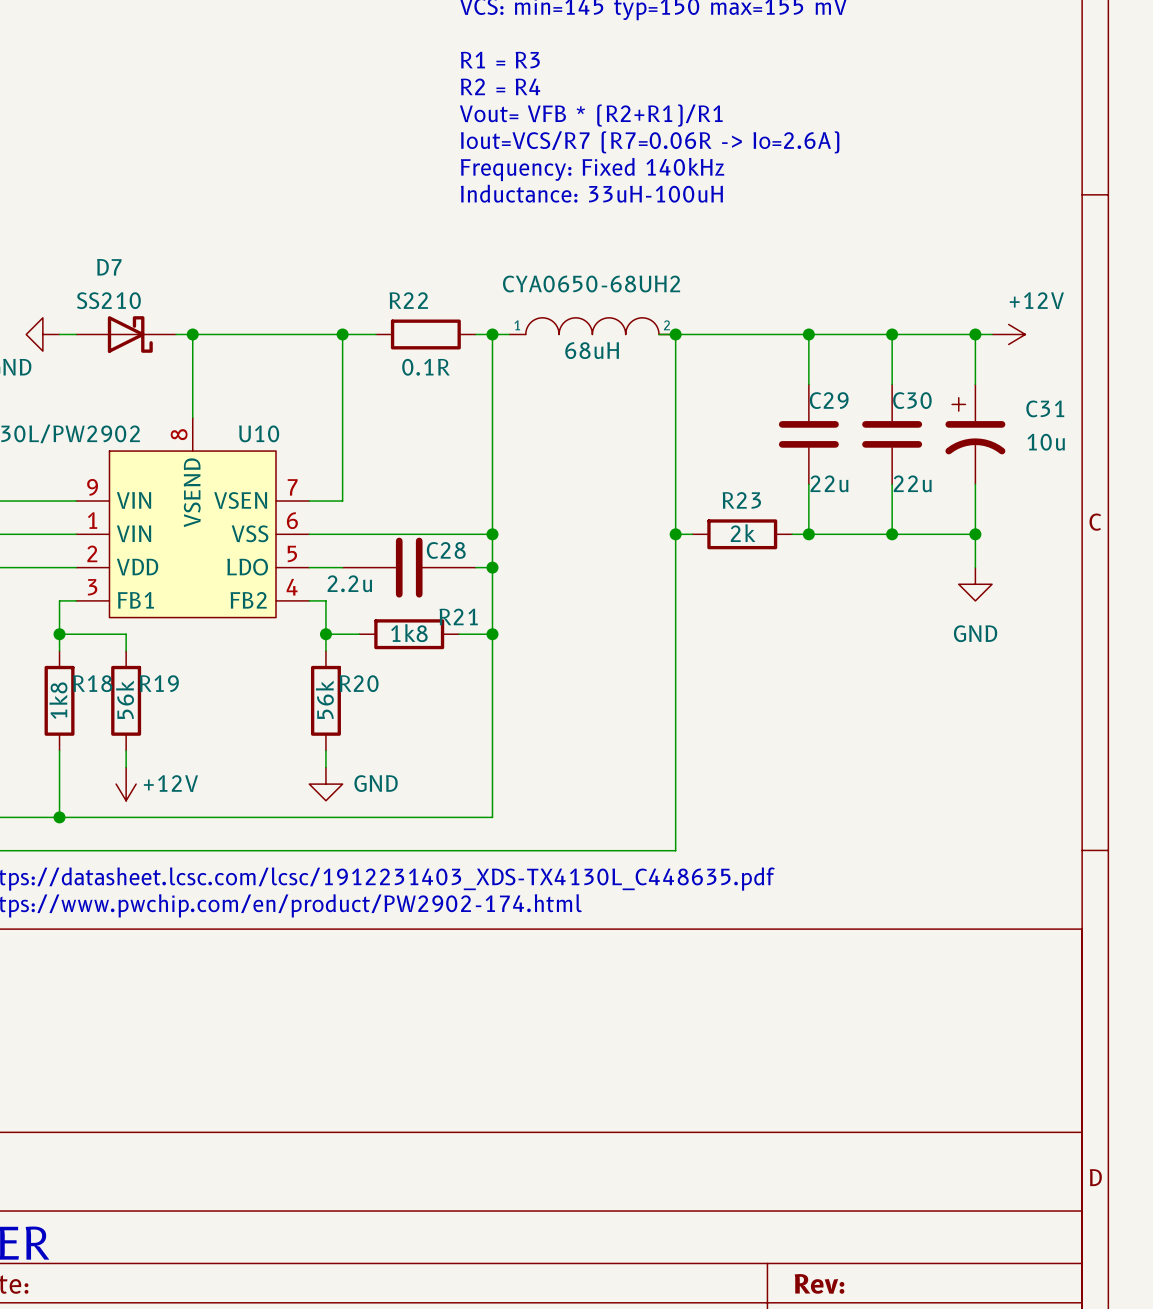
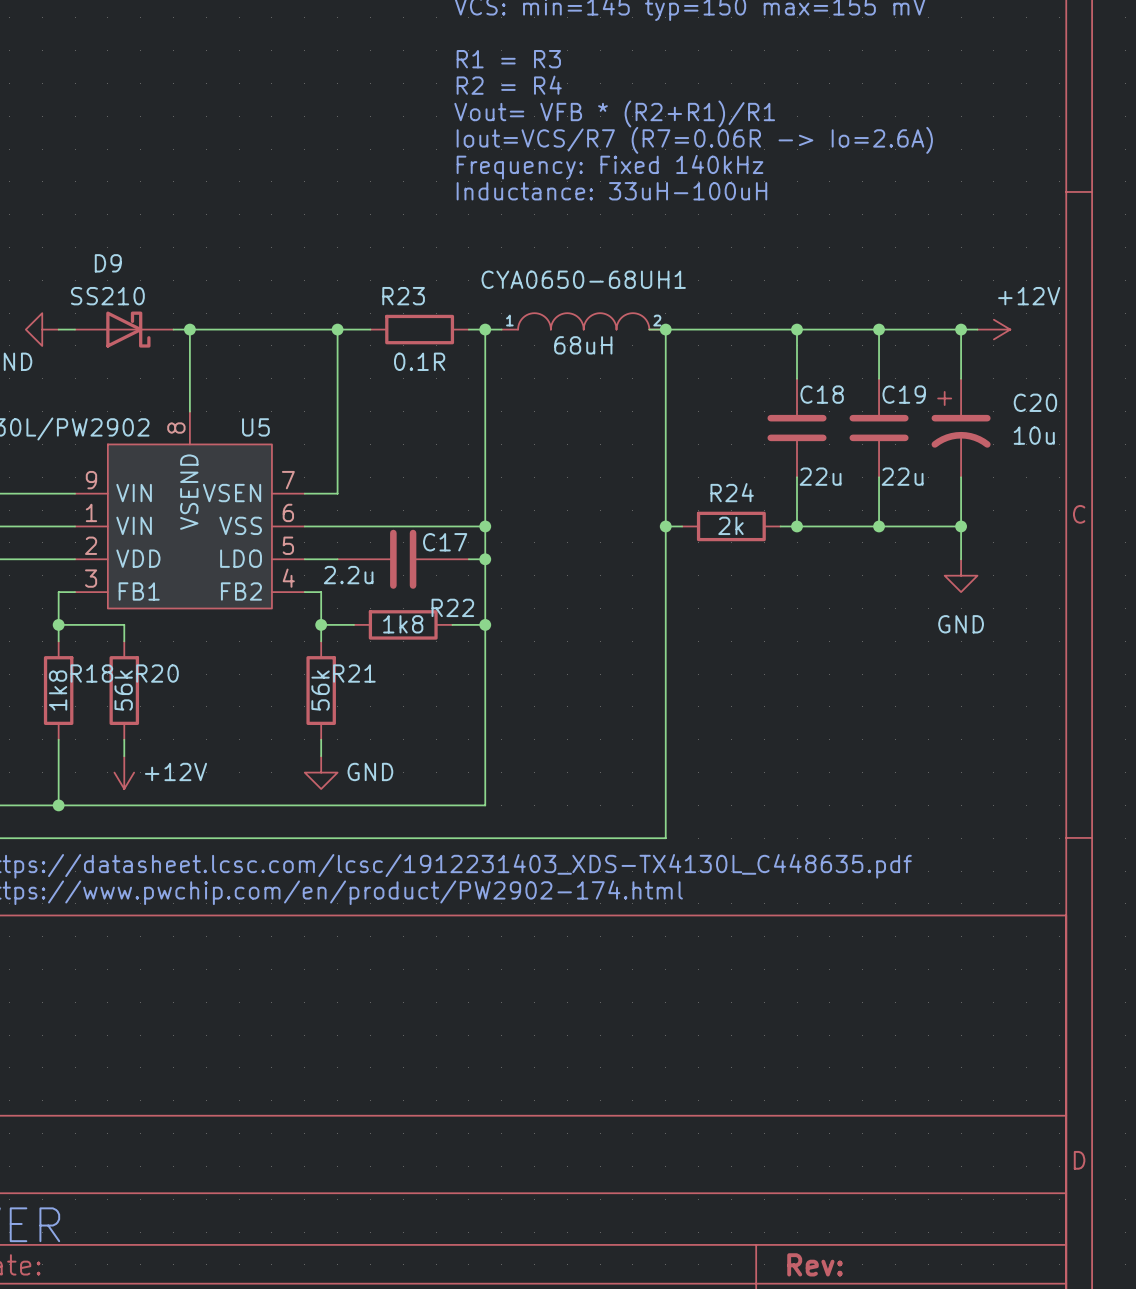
D7 name: D7 (109, 267) -> D9 (108, 263)
CYA0650-68UH2 name: CYA0650-68UH2 (591, 284) -> CYA0650-68UH1 (583, 279)
R22 name: R22 (408, 300) -> R23 (403, 296)
C29 name: C29 (829, 400) -> C18 (822, 394)
C30 name: C30 (912, 400) -> C19 (904, 394)
C31 name: C31 (1045, 408) -> C20 (1035, 402)
U10 name: U10 (259, 433) -> U5 (255, 427)
R23 name: R23 (741, 500) -> R24 (732, 492)
C28 name: C28 (446, 550) -> C17 (445, 542)
R21 name: R21 (458, 616) -> R22 (452, 607)
R19 name: R19 (159, 683) -> R20 (157, 673)
R20 name: R20 (359, 683) -> R21 (354, 673)

